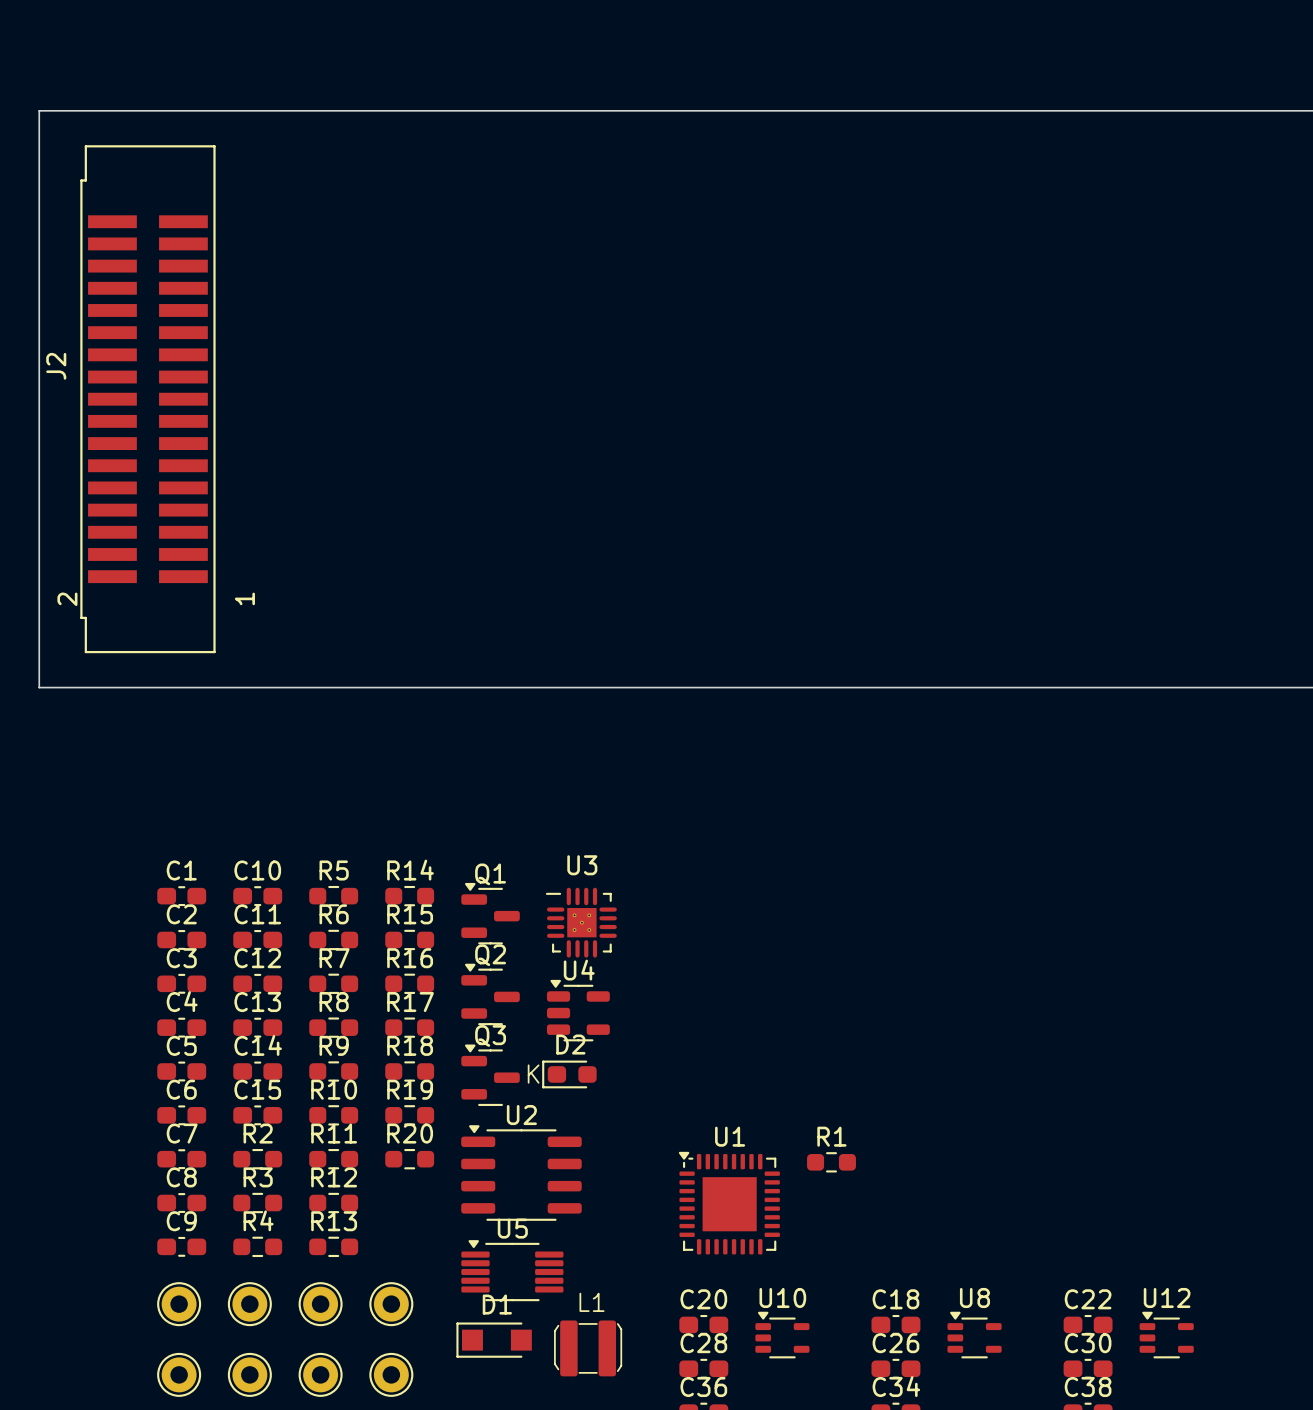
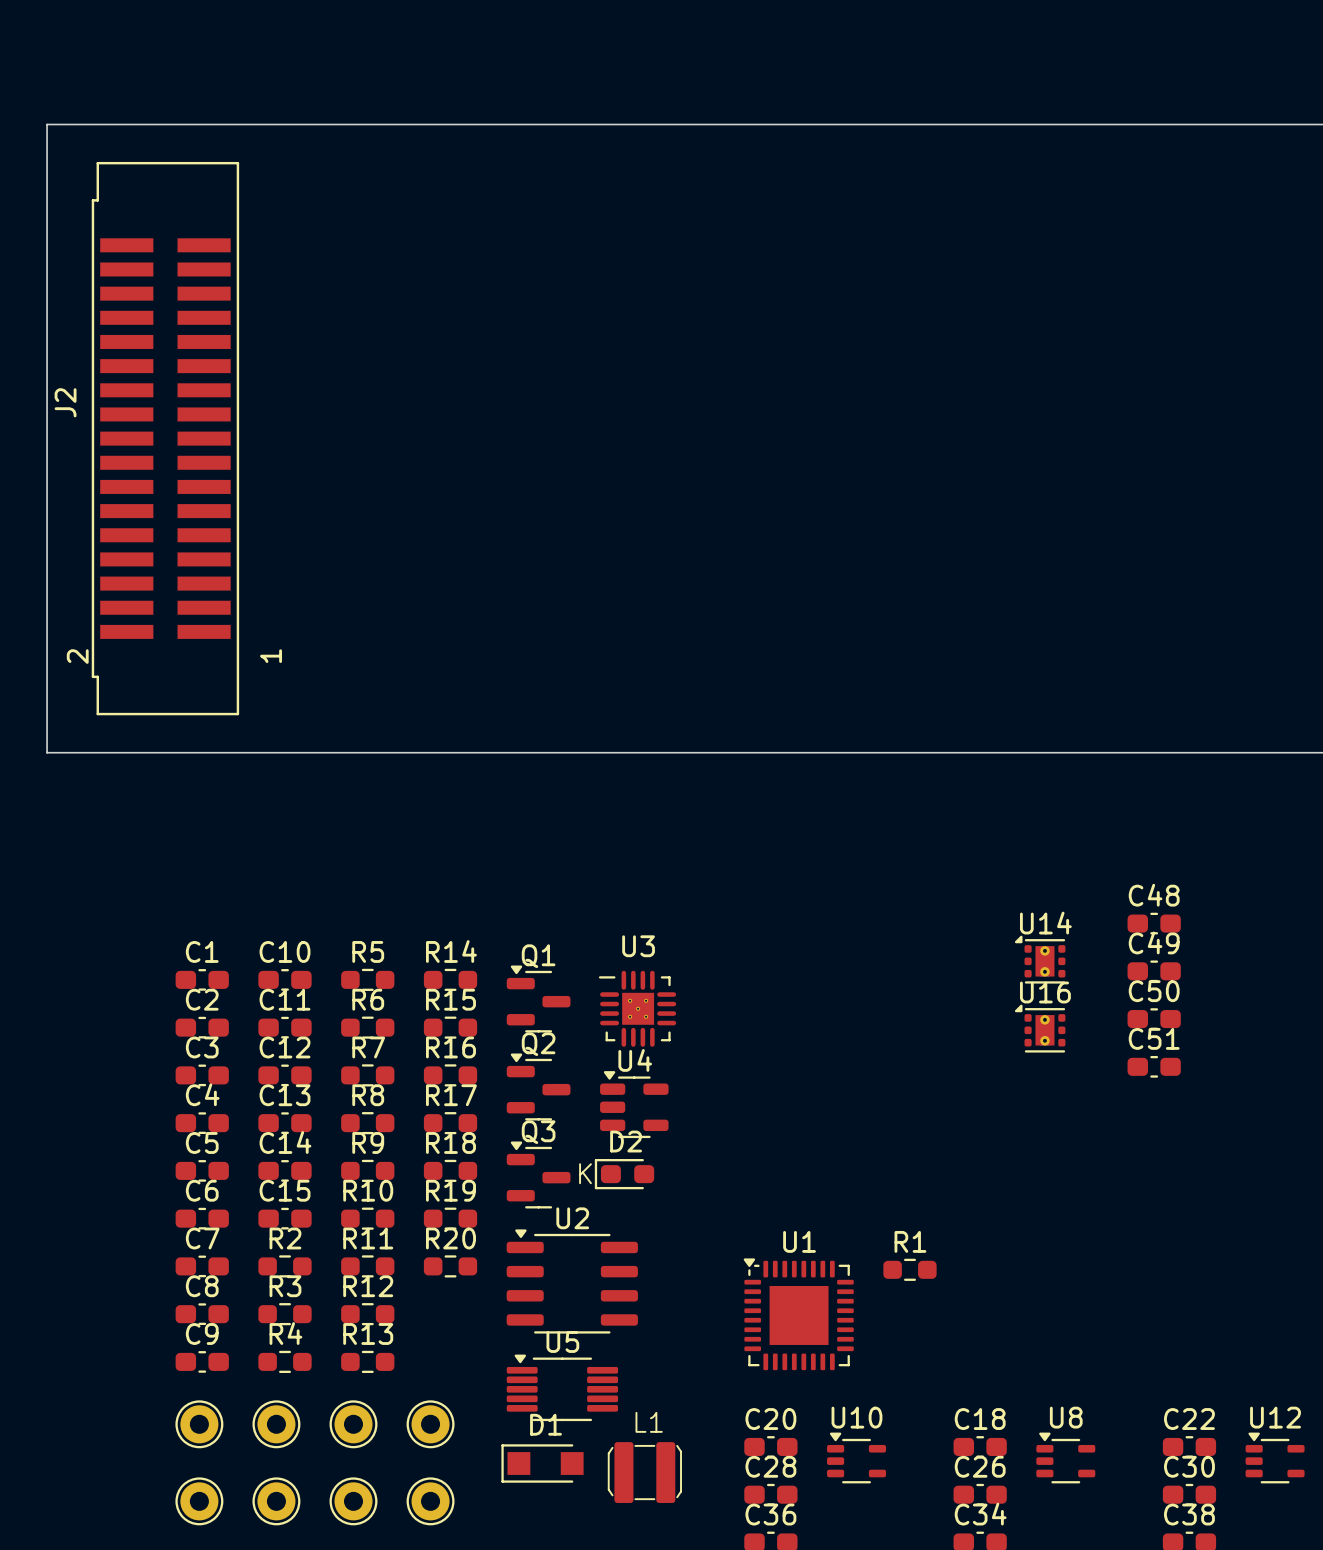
C48: none -> (1154, 923)
U14: none -> (1040, 959)
C49: none -> (1154, 971)
C50: none -> (1154, 1019)
U16: none -> (1040, 1028)
C51: none -> (1154, 1066)

